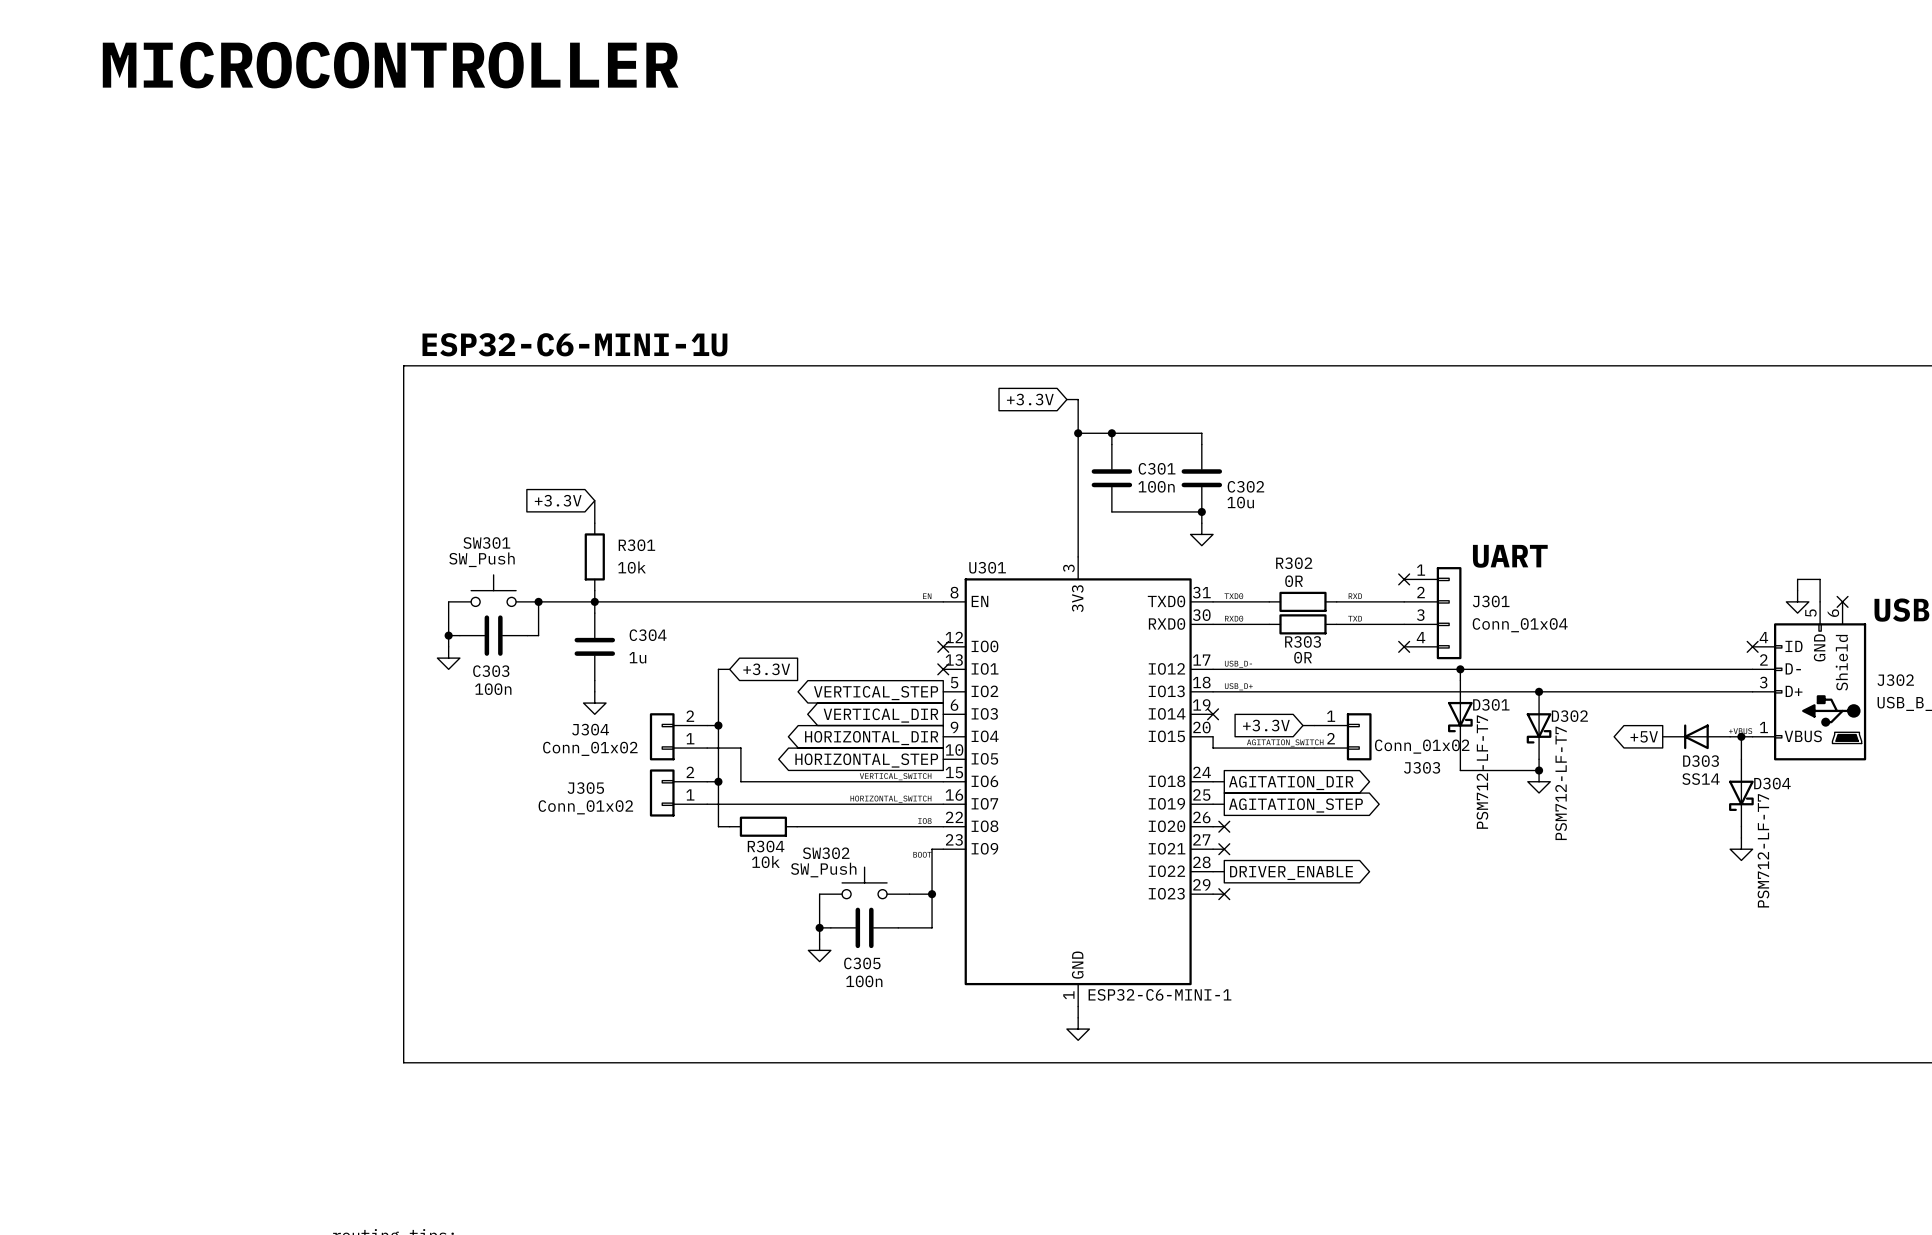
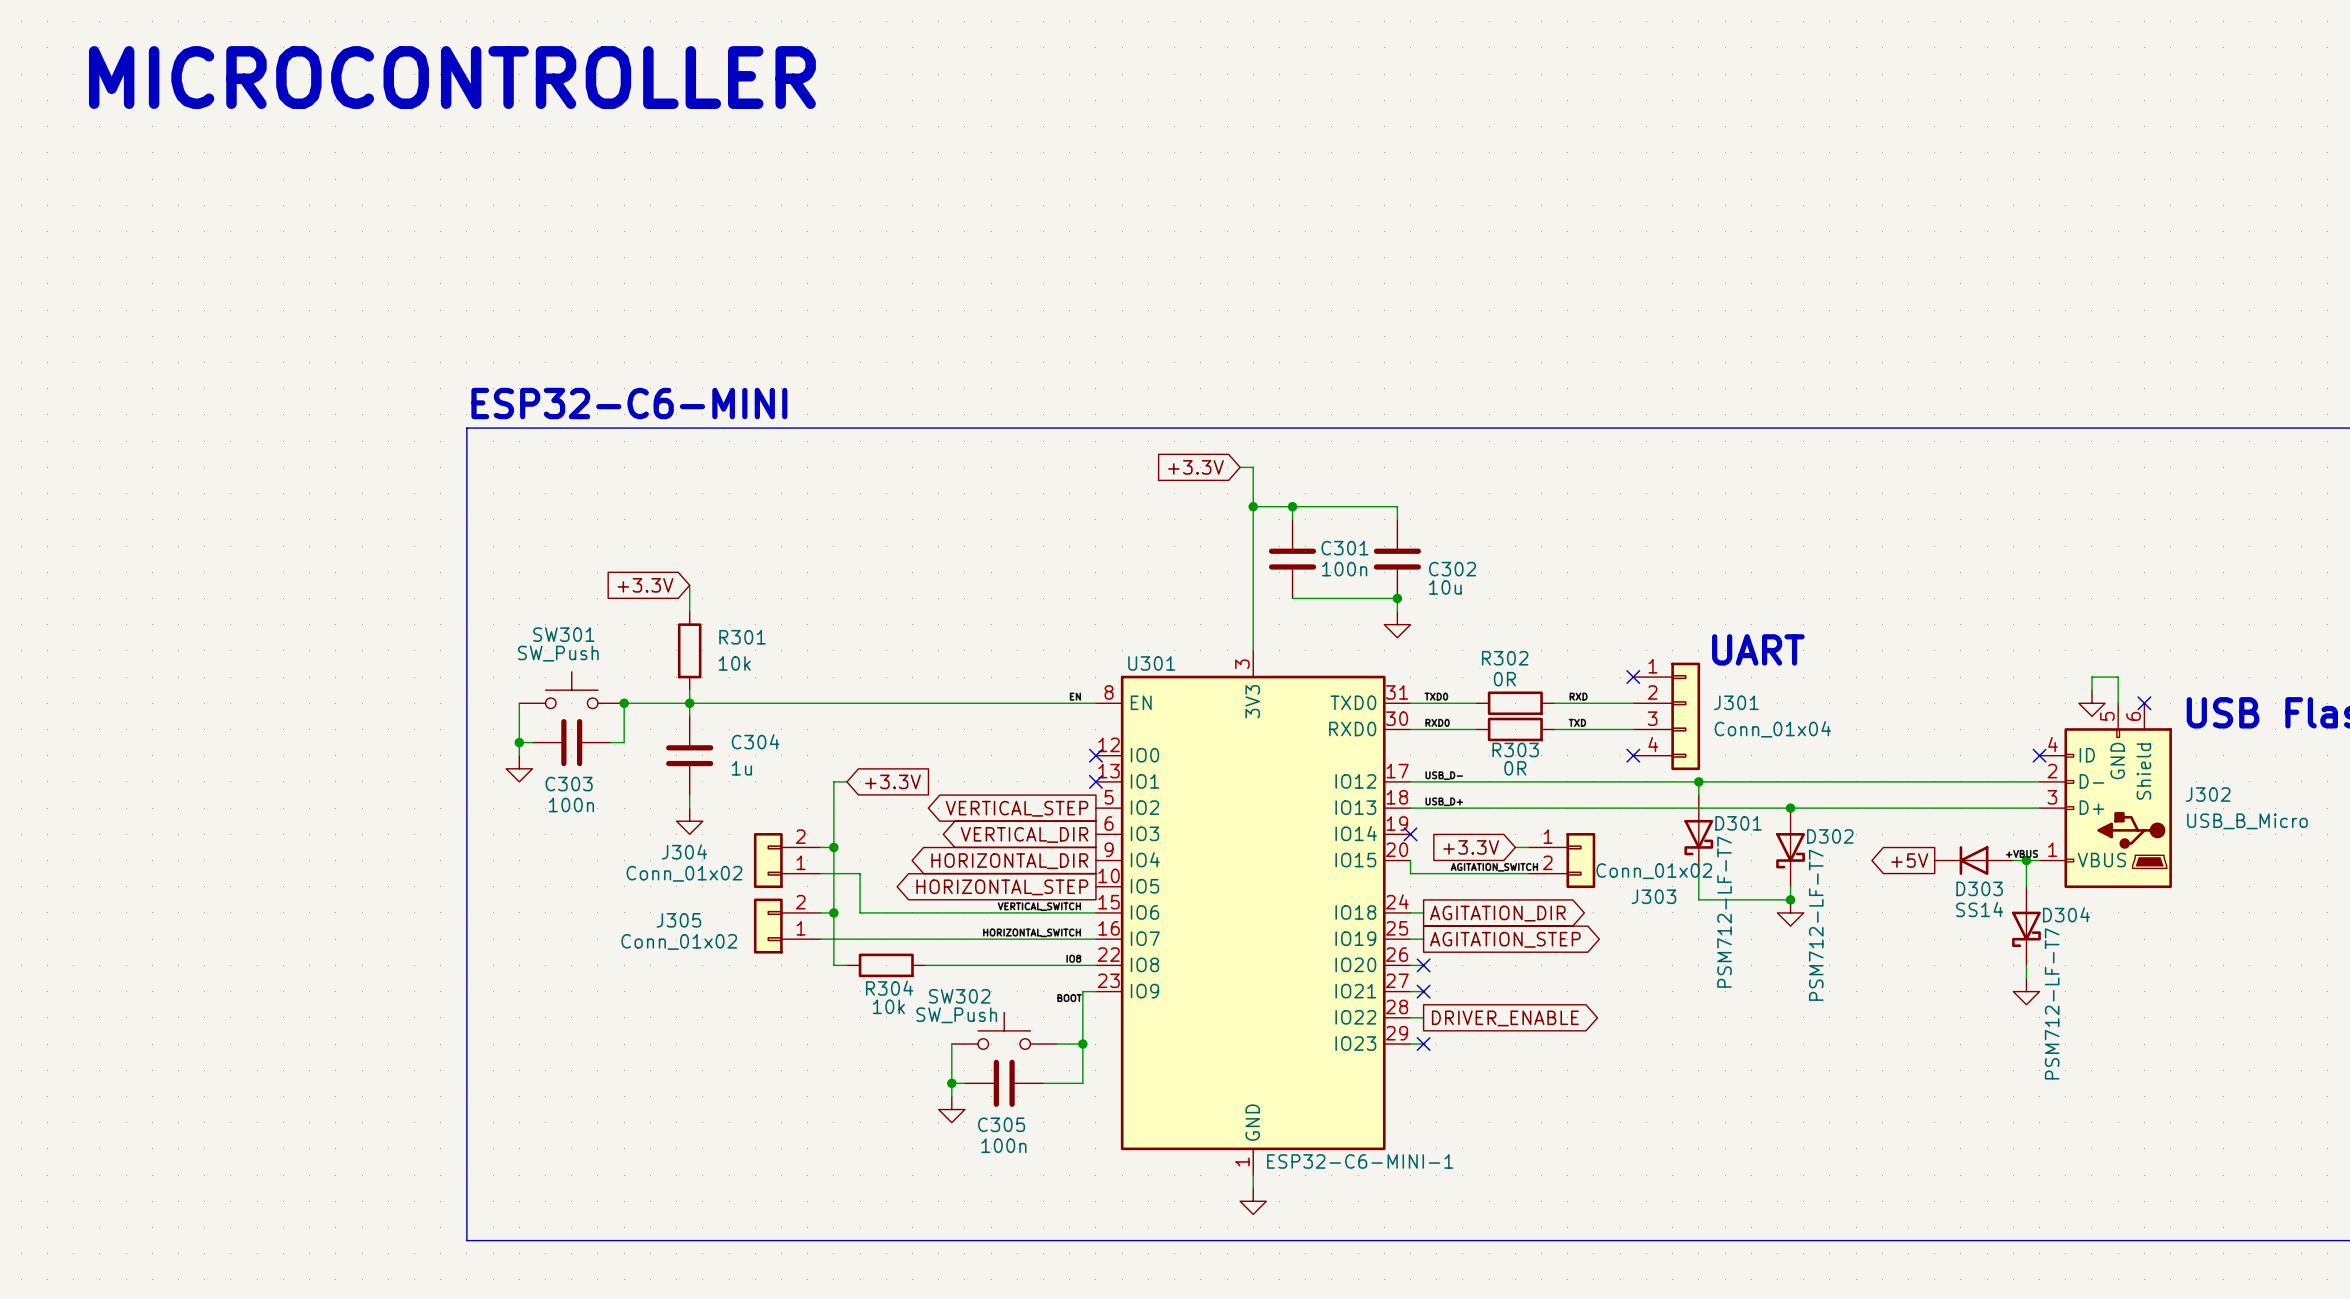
text: ESP32-C6-MINI-1U (574, 344) -> ESP32-C6-MINI (629, 403)

